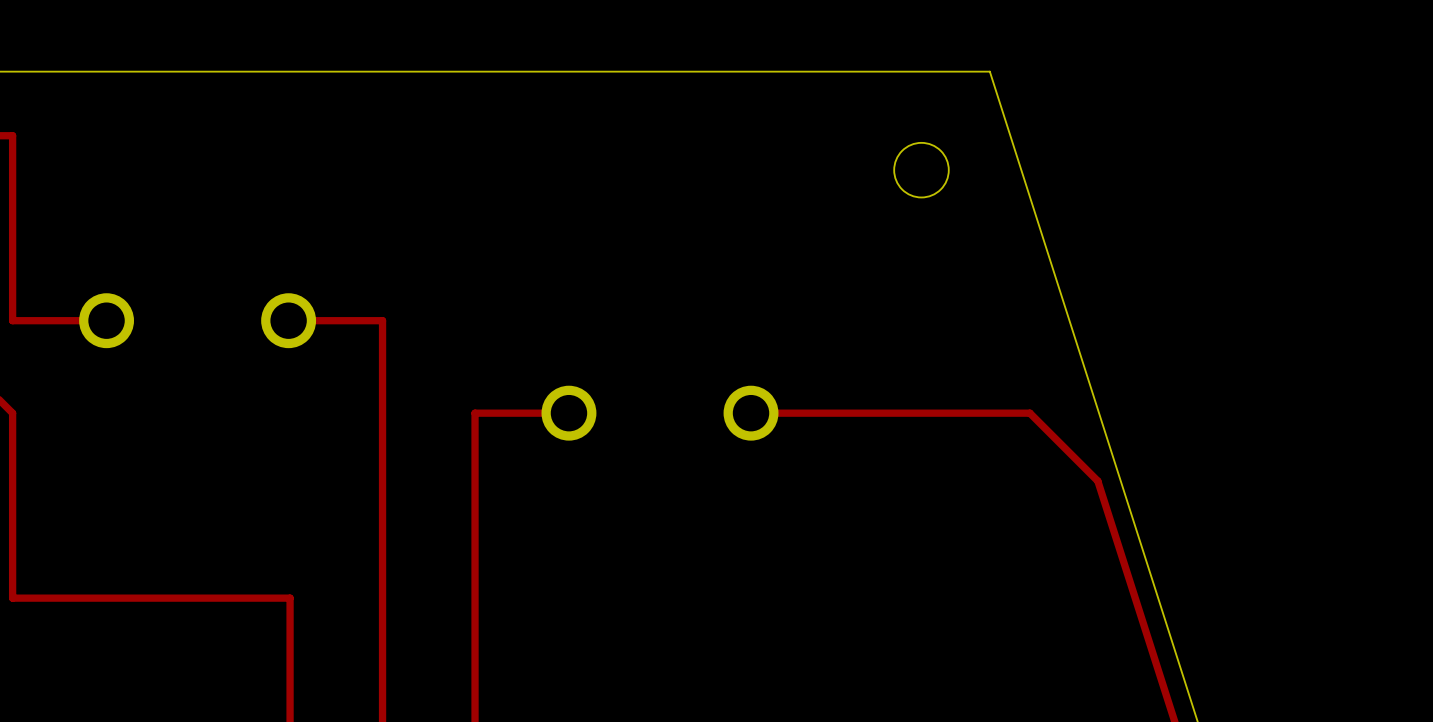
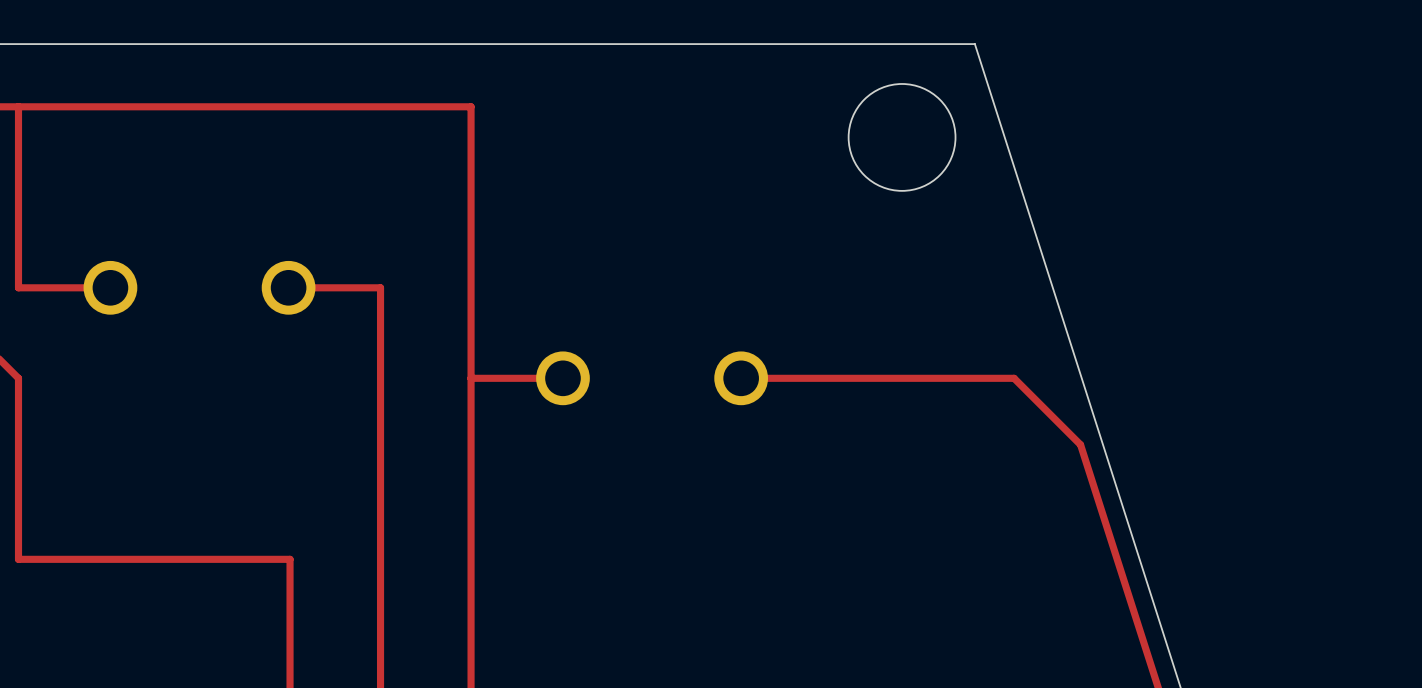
top track: none -> (18, 106) (471, 106) (471, 378)
round board edge size: [893, 141, 950, 199] -> [847, 83, 957, 192]

